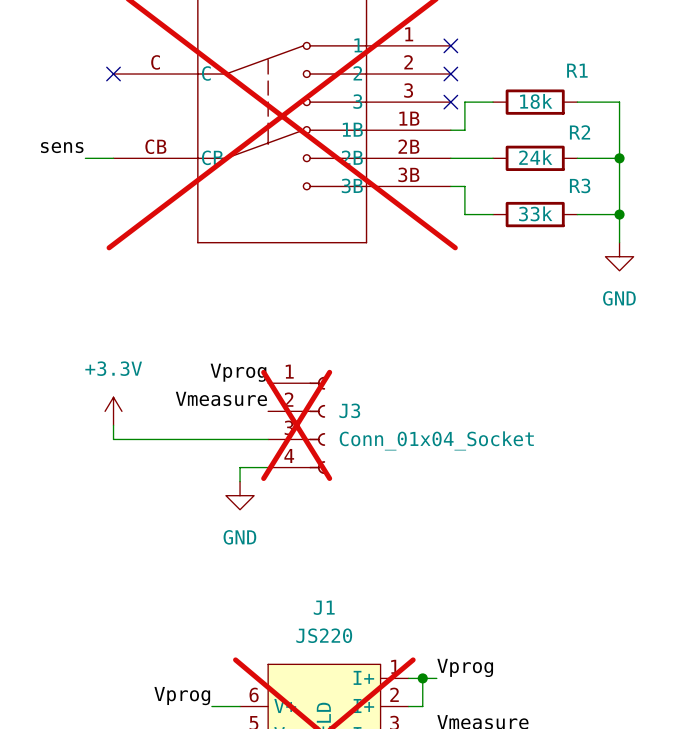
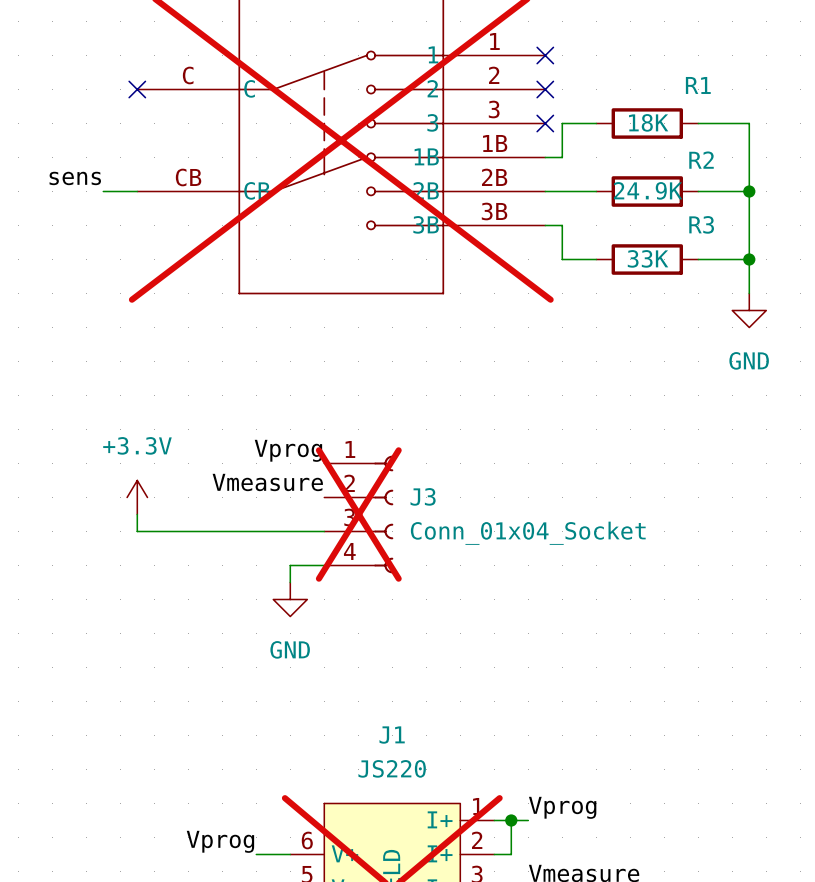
R1 value: 18k (536, 101) -> 18K (648, 122)
R2 value: 24k (535, 157) -> 24.9K (648, 190)
R3 value: 33k (535, 213) -> 33K (648, 258)

